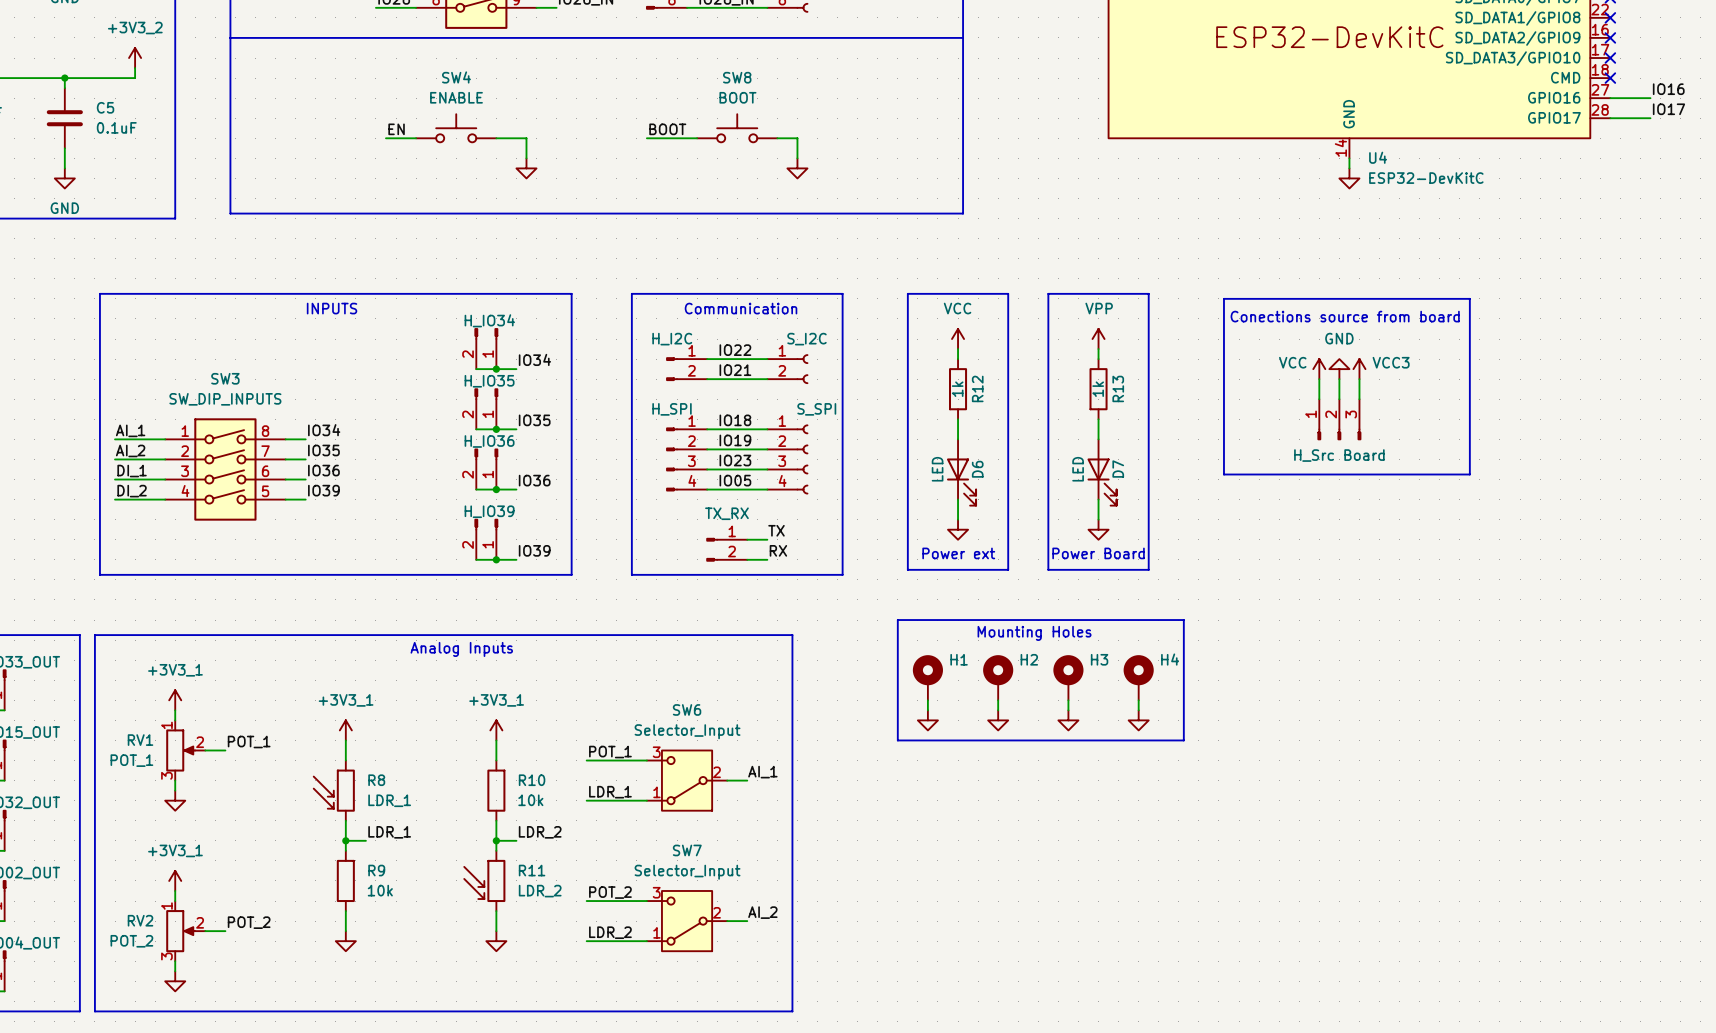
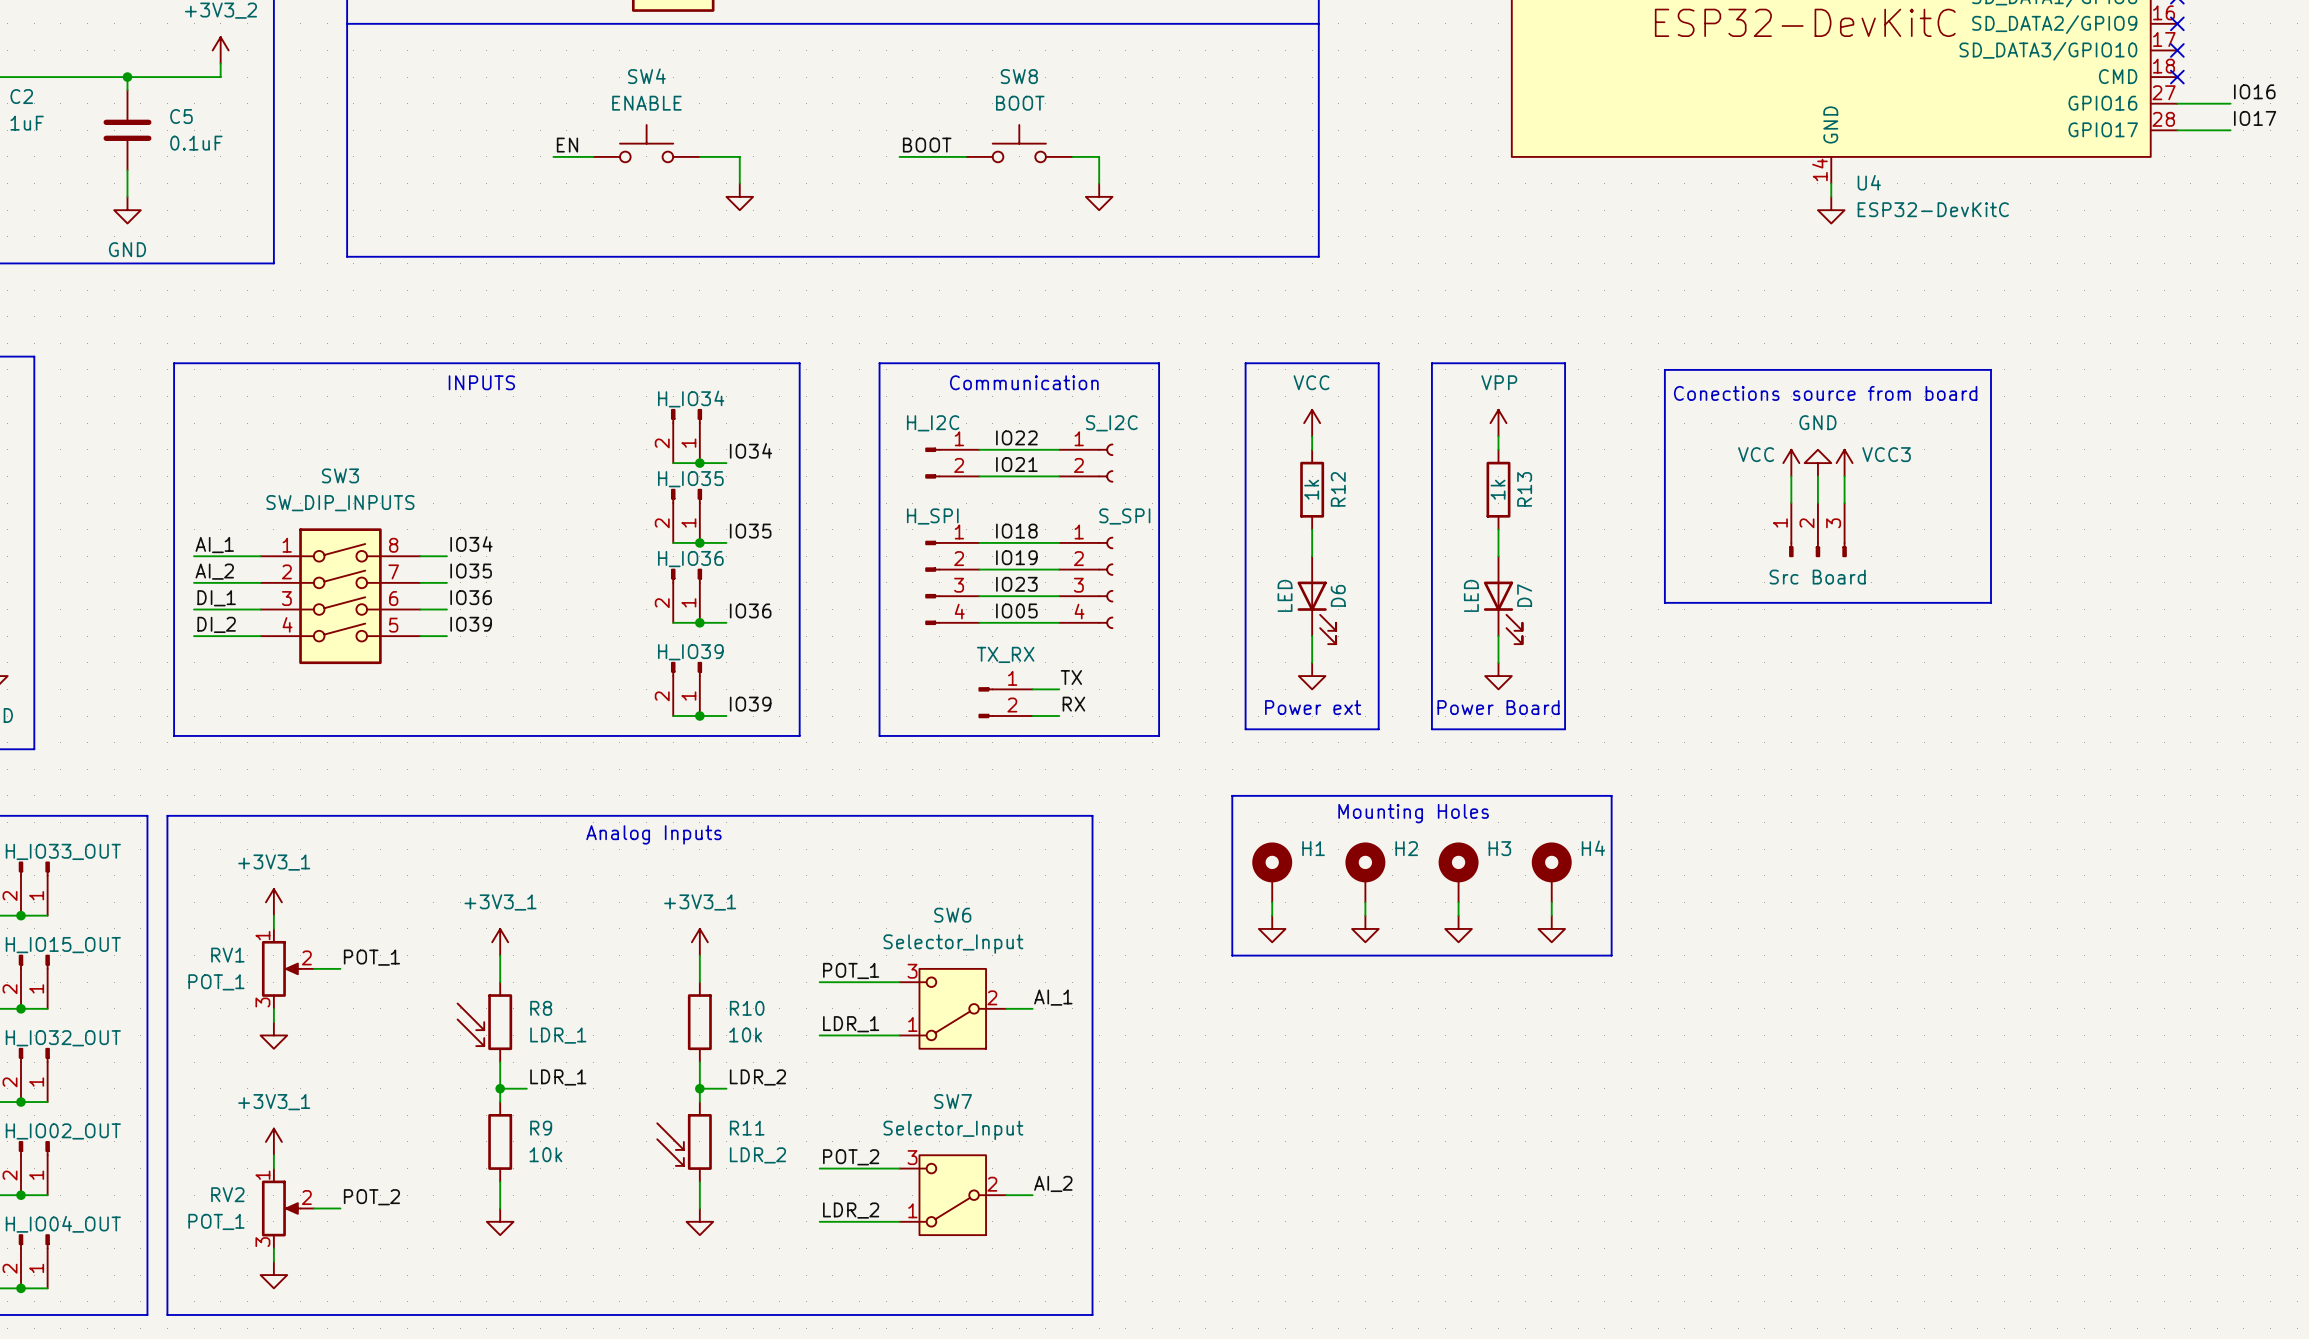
part value: H_Src Board (1339, 455) -> Src Board (1817, 577)
RV2 value: POT_2 (131, 941) -> POT_1 (216, 1221)

